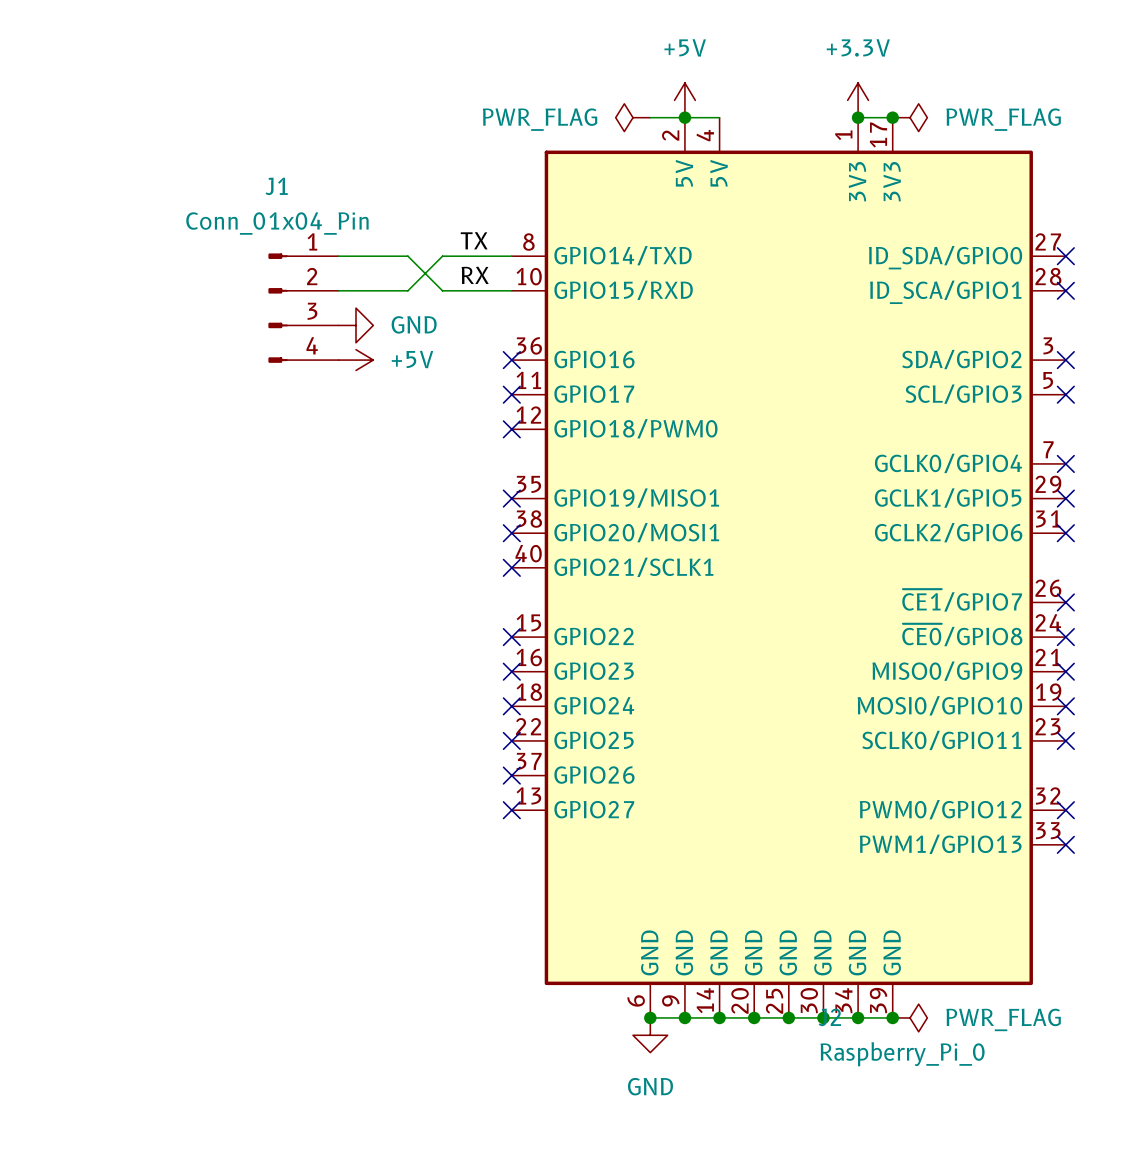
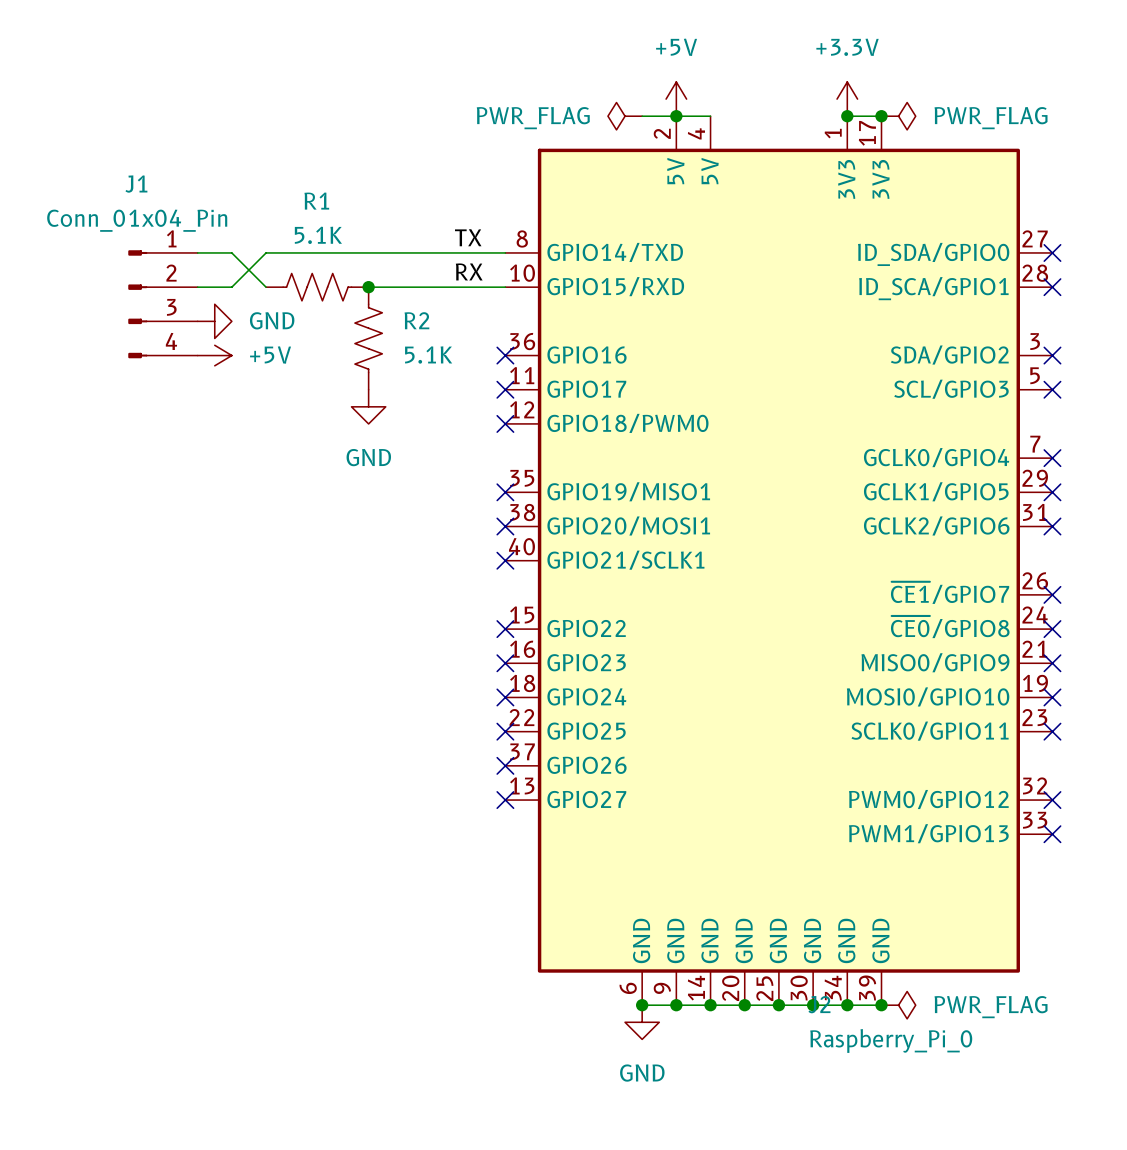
wire: none -> (197, 252) (231, 252) (266, 287)
wire: none -> (334, 252) (266, 252) (231, 287) (197, 287)
wire: (407, 256) (442, 290) -> (402, 252) (437, 252)
wire: (442, 256) (407, 290) -> (437, 287) (402, 287)
R1: none -> 5.1K (317, 287)
junction: none -> (368, 287)
J1 position: (303, 308) -> (162, 304)
power symbol: none -> GND (214, 321)
power symbol: GND (355, 325) -> none
R2: none -> 5.1K (368, 338)
power symbol position: +5V (355, 360) -> +5V (214, 355)
power symbol: none -> GND (368, 406)

